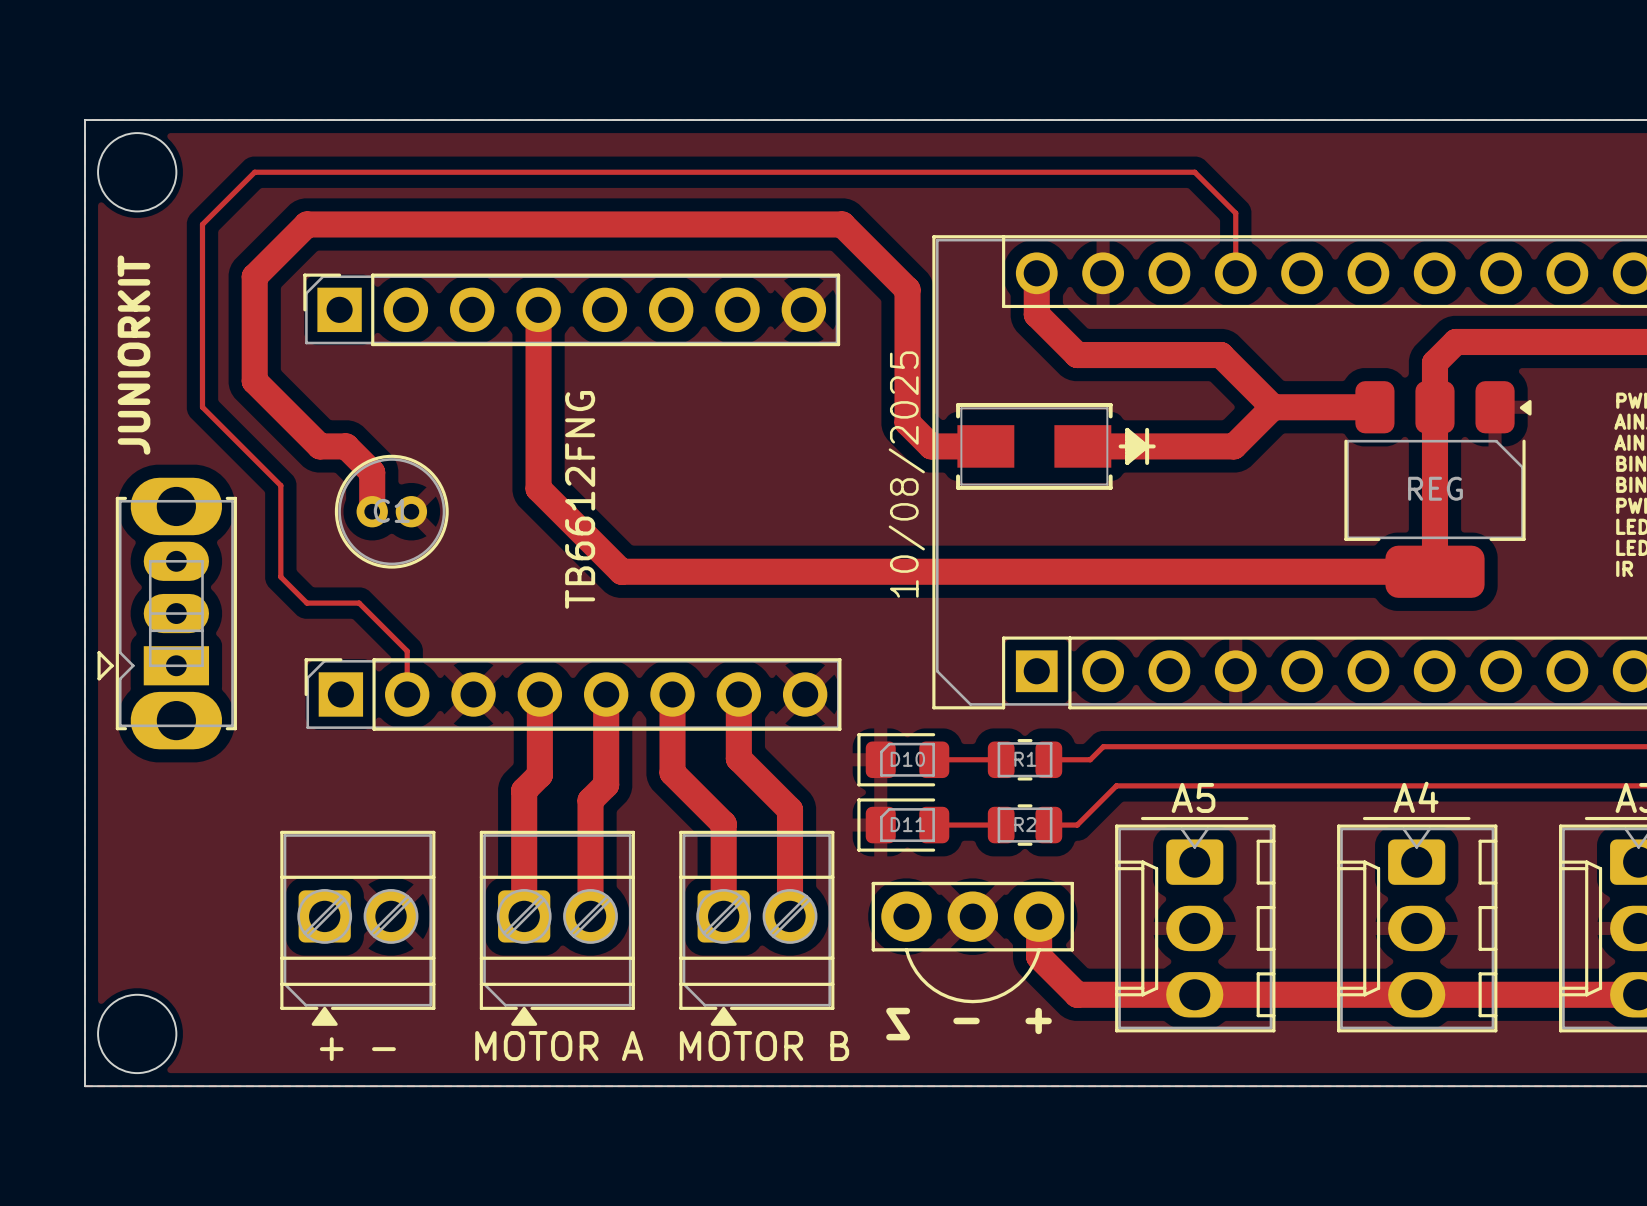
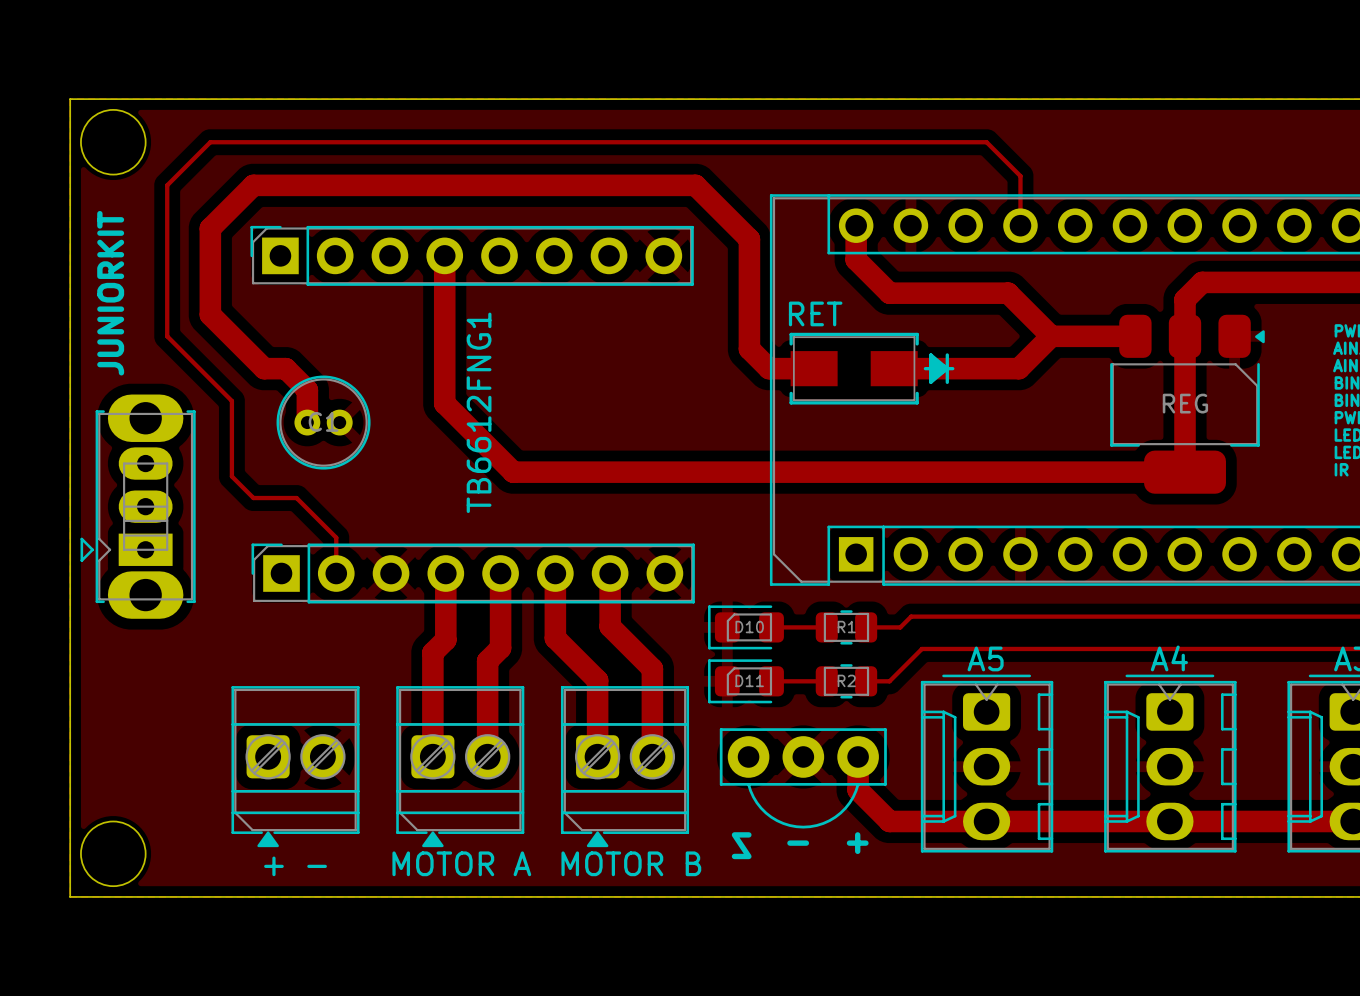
RET name: none -> RET (815, 313)
text: 10/08/2025 (906, 474) -> none
TB6612FNG name: TB6612FNG (580, 499) -> TB6612FNG1 (479, 412)

